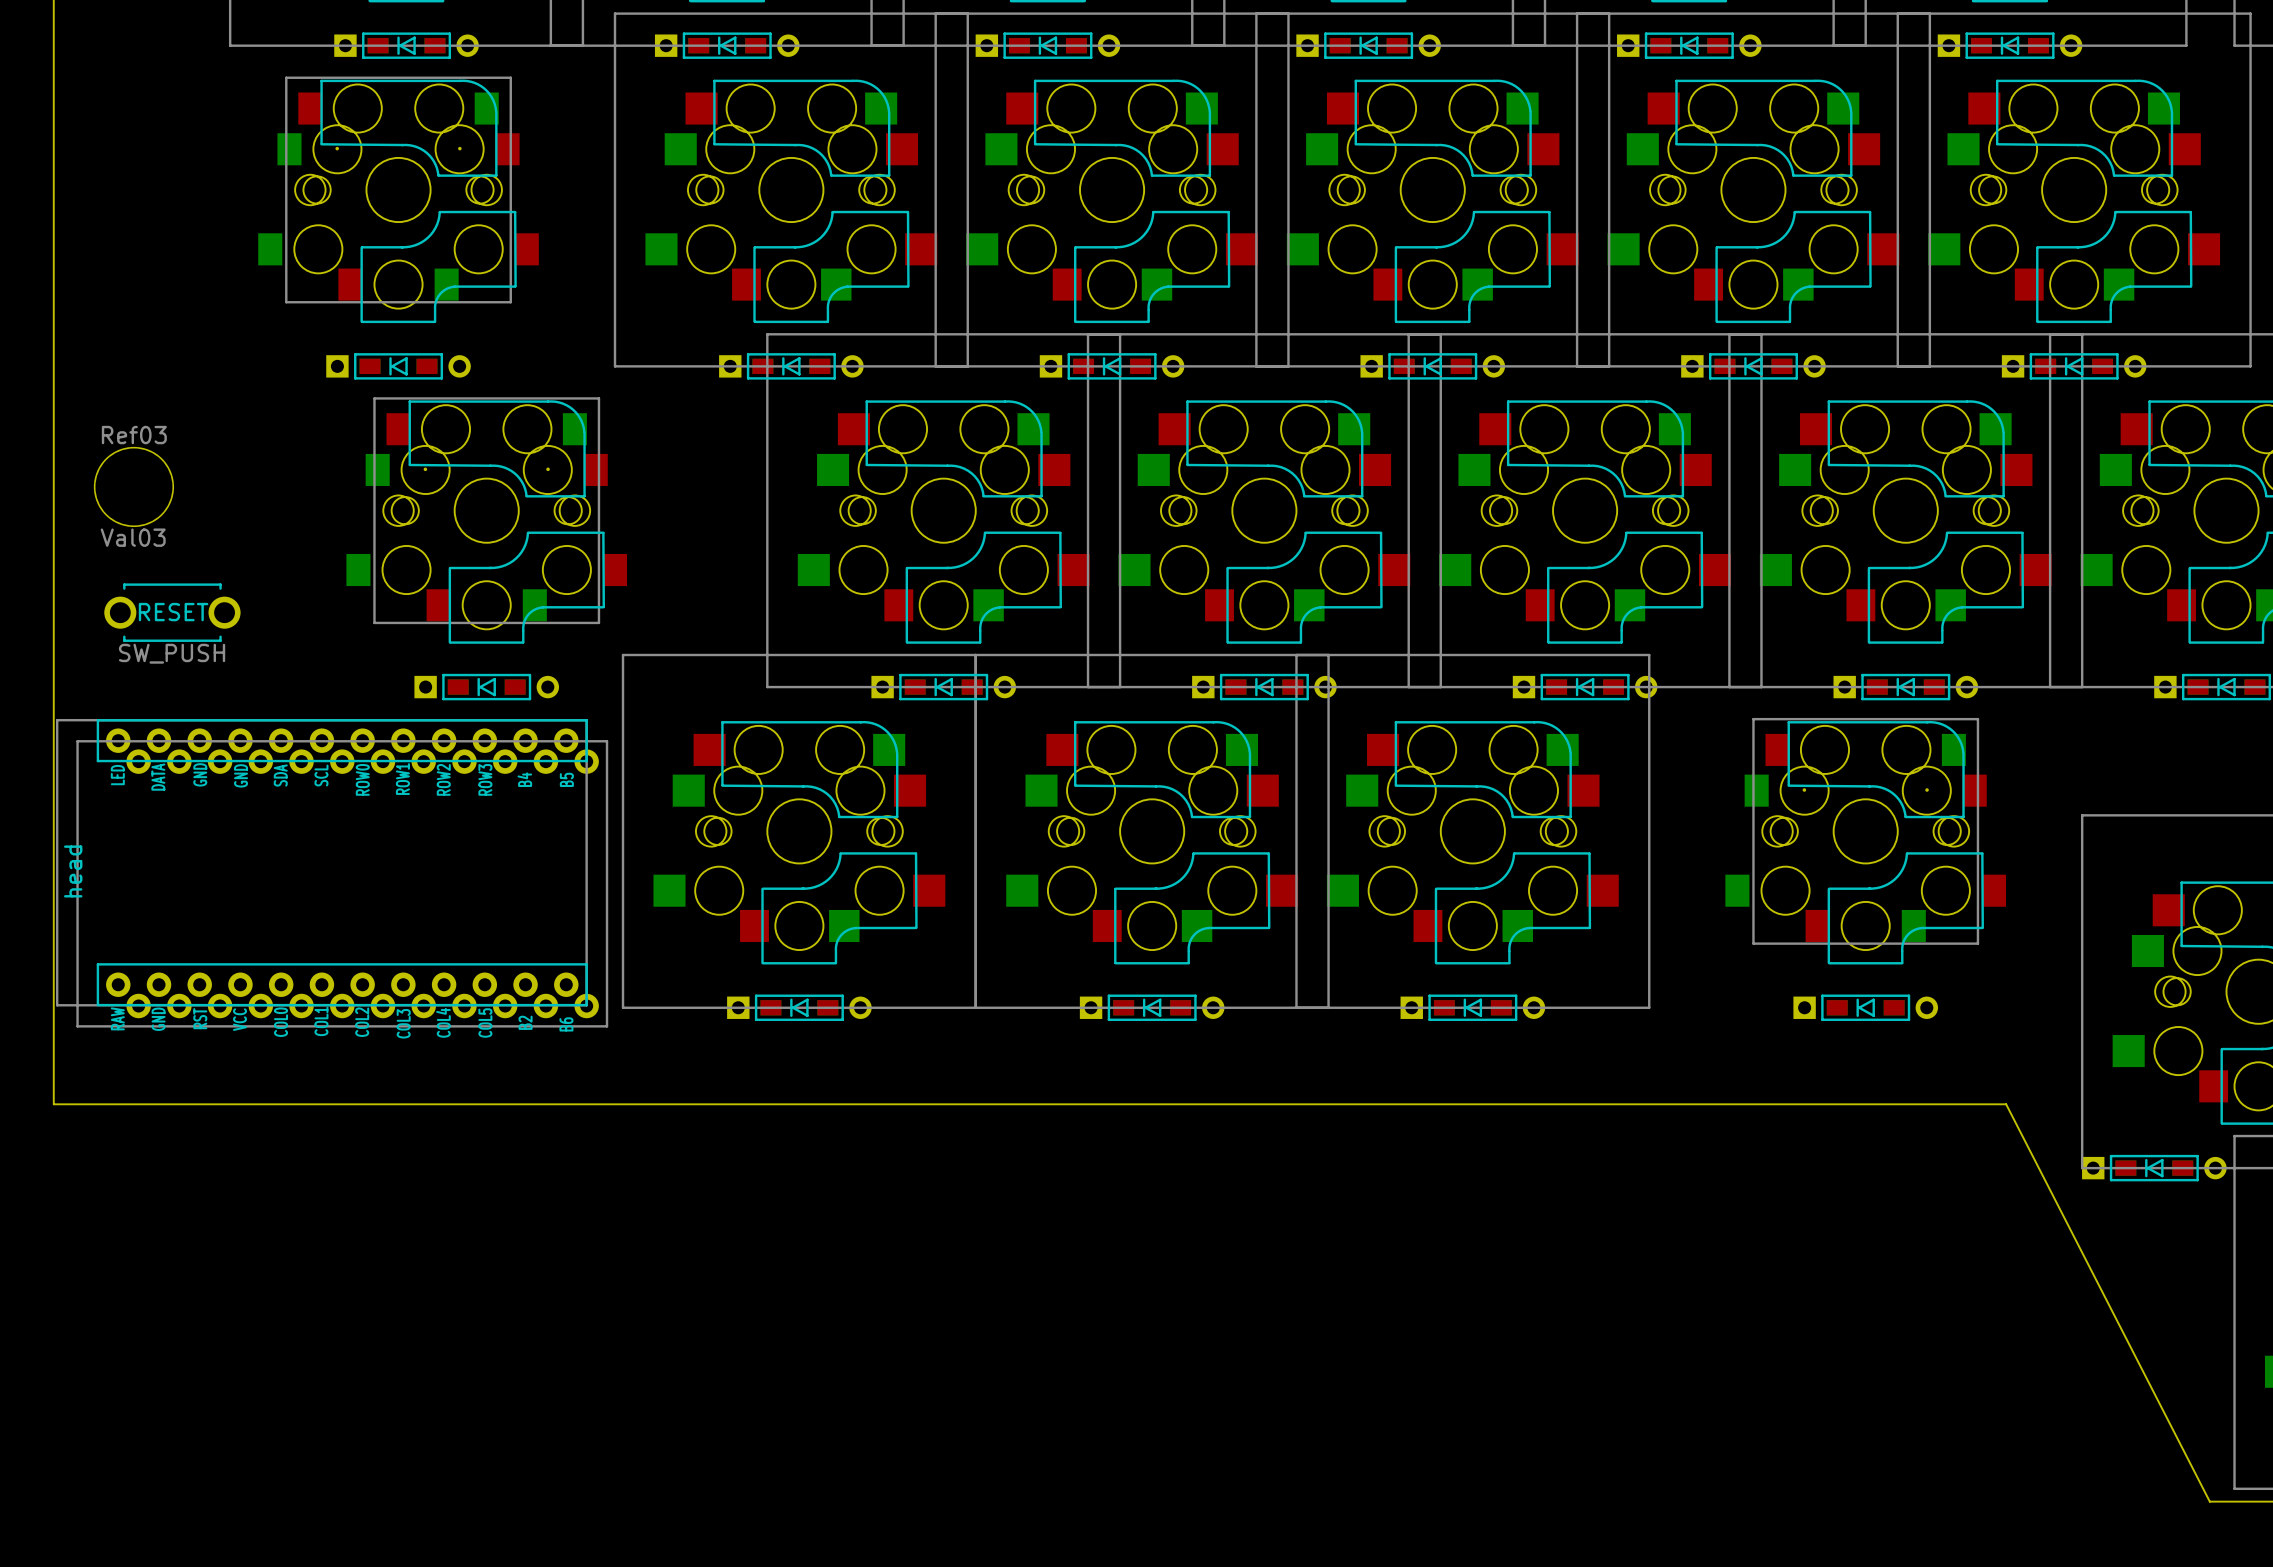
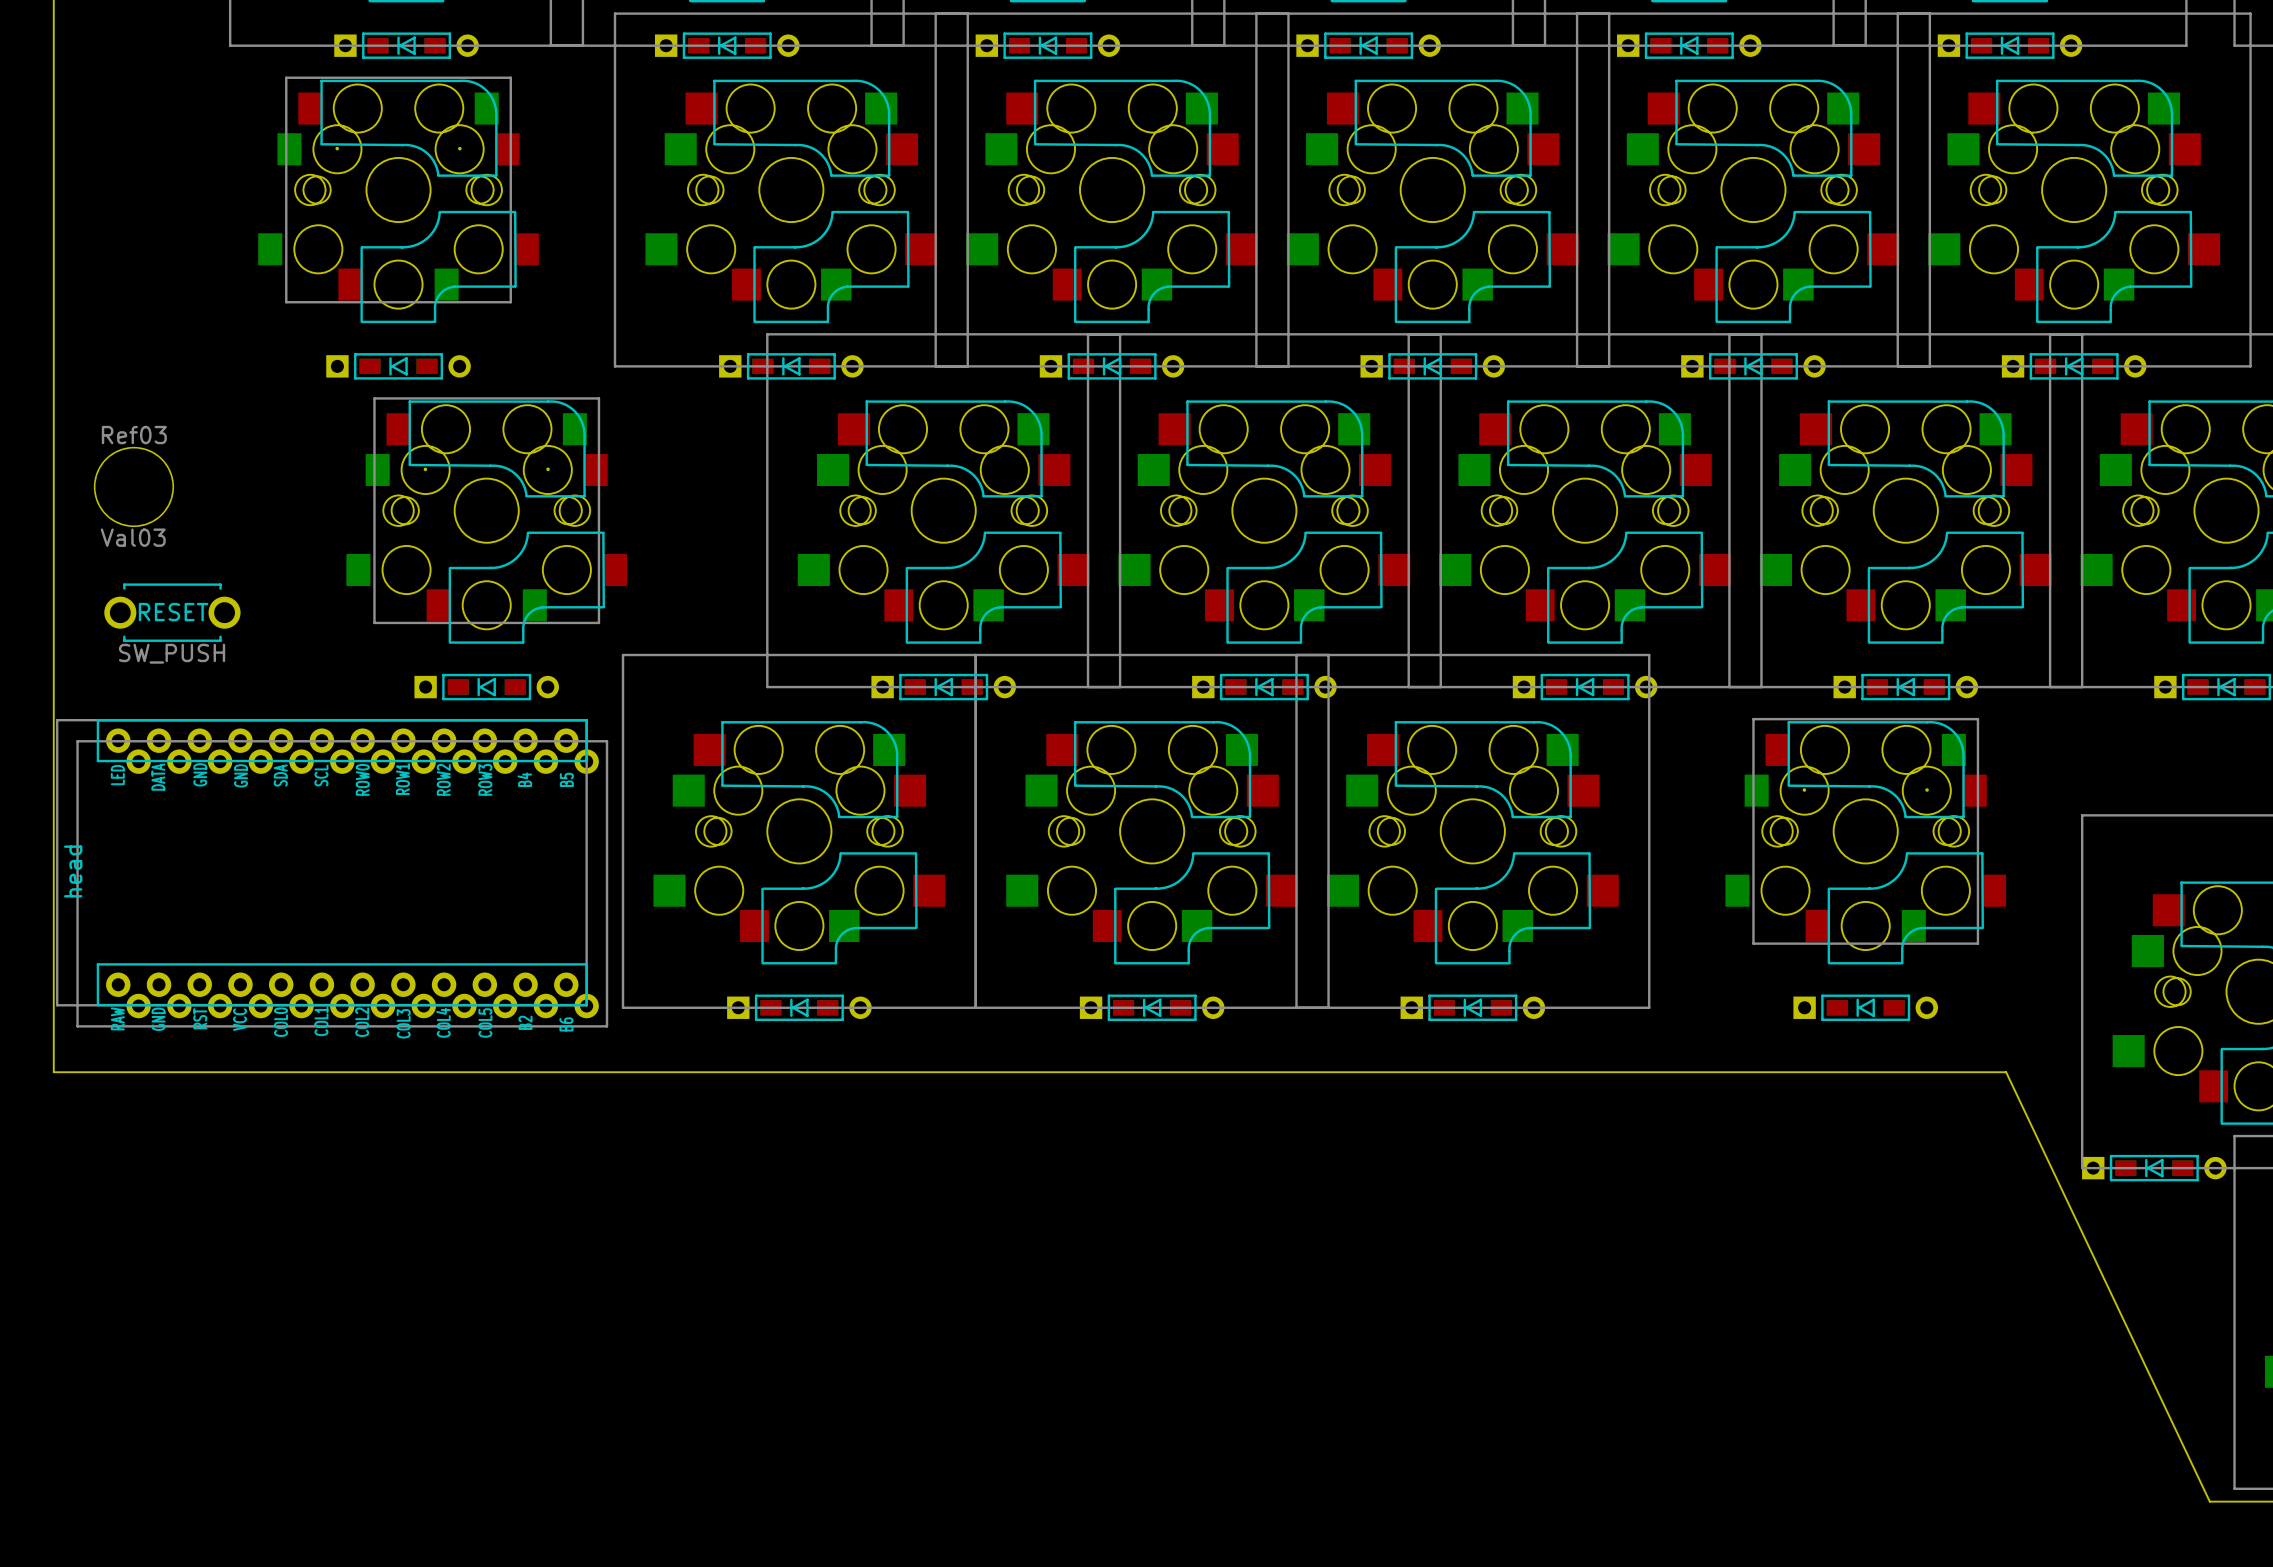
board edge: (53, 1072) (53, 1104) (2006, 1104) (2209, 1501) -> (53, 1072) (2006, 1072) (2209, 1501)

